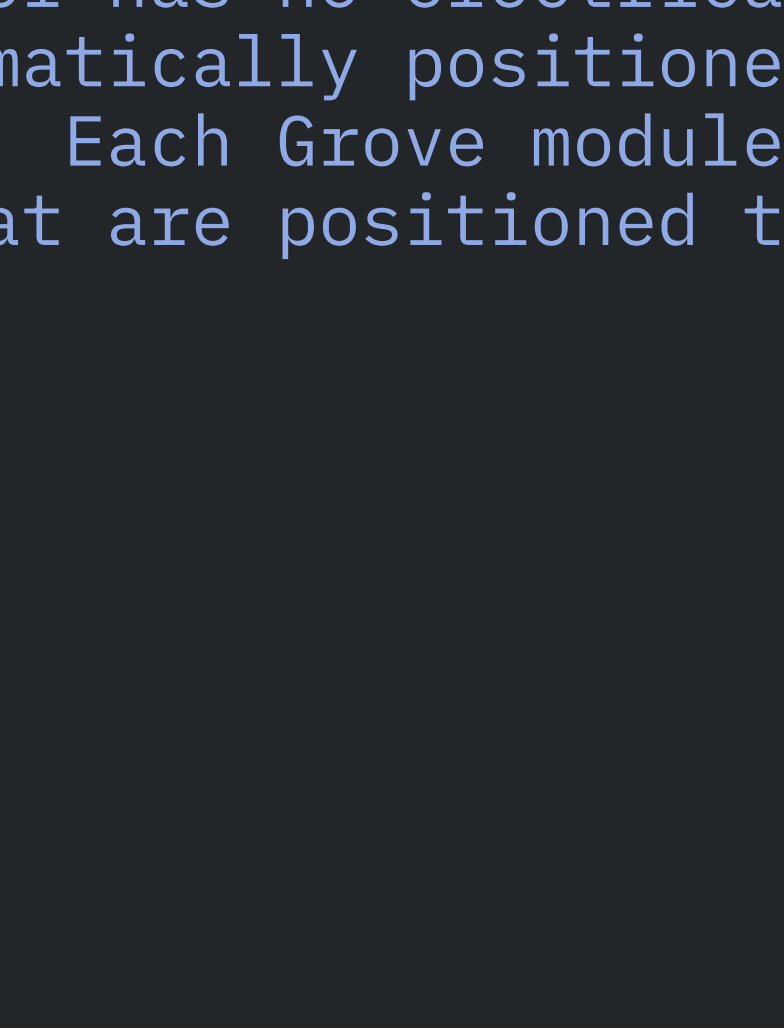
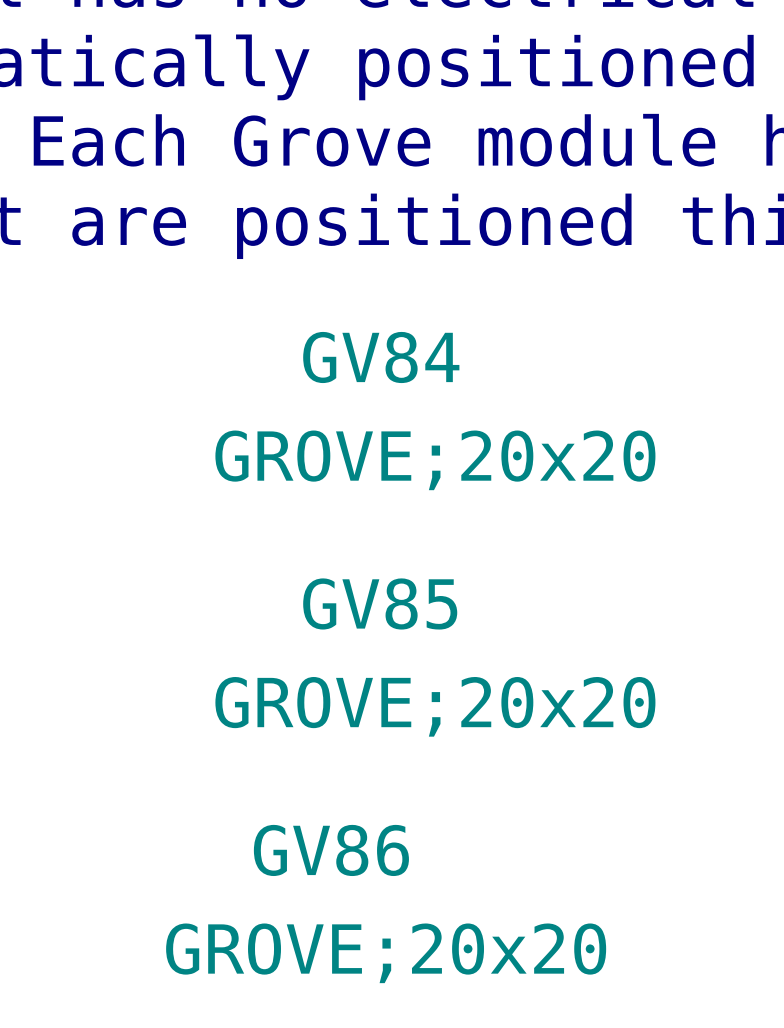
GV84: none -> GROVE;20x20 (435, 411)
GV85: none -> GROVE;20x20 (435, 657)
GV86: none -> GROVE;20x20 (386, 904)

